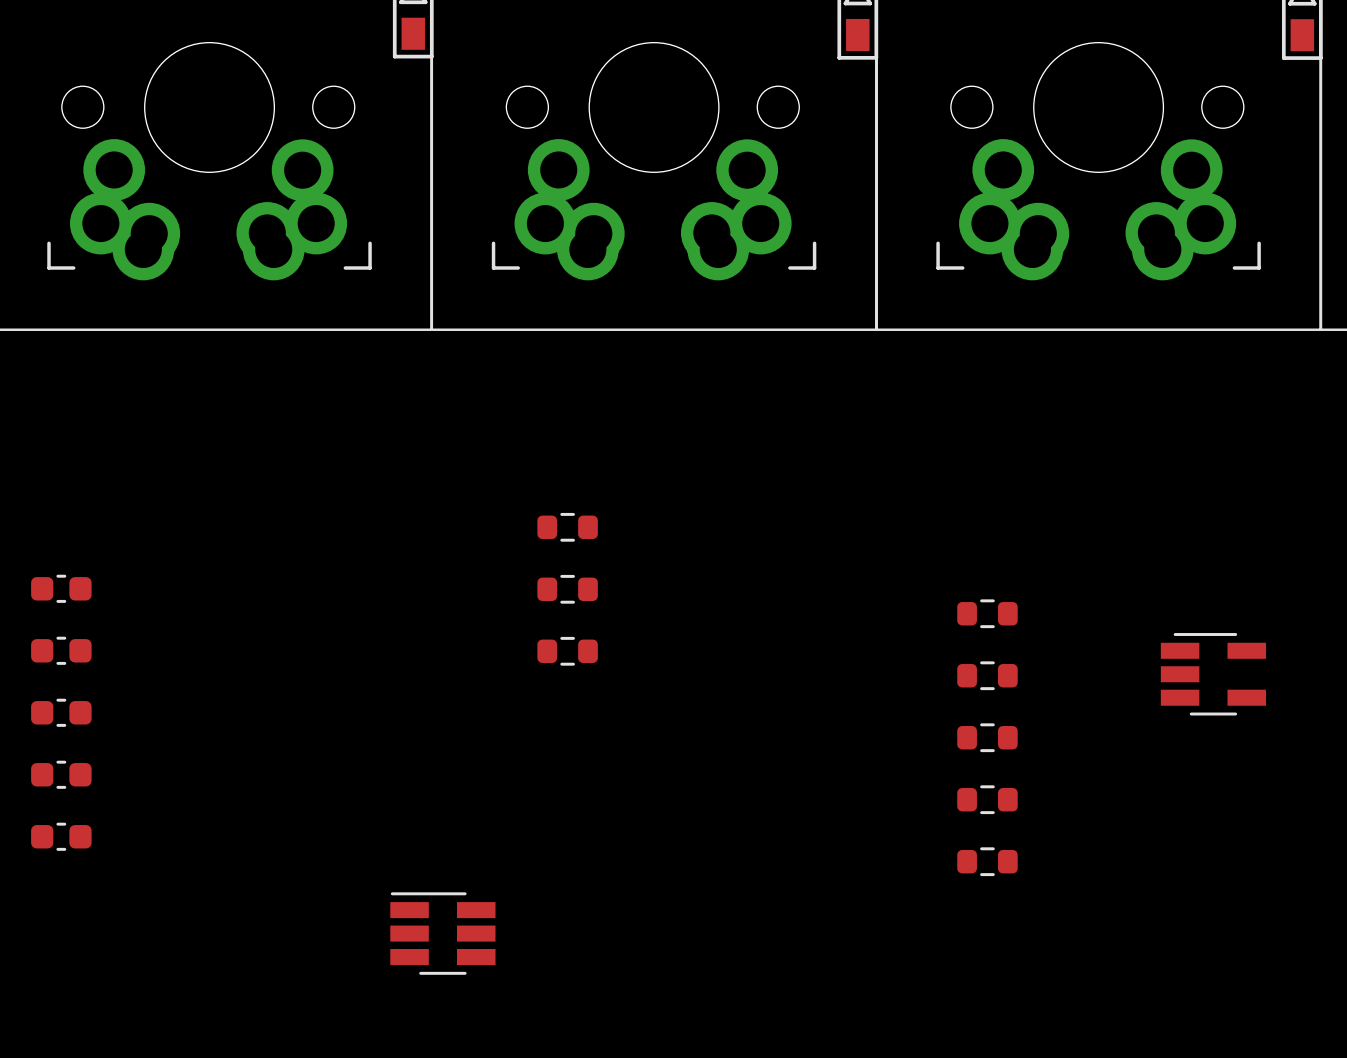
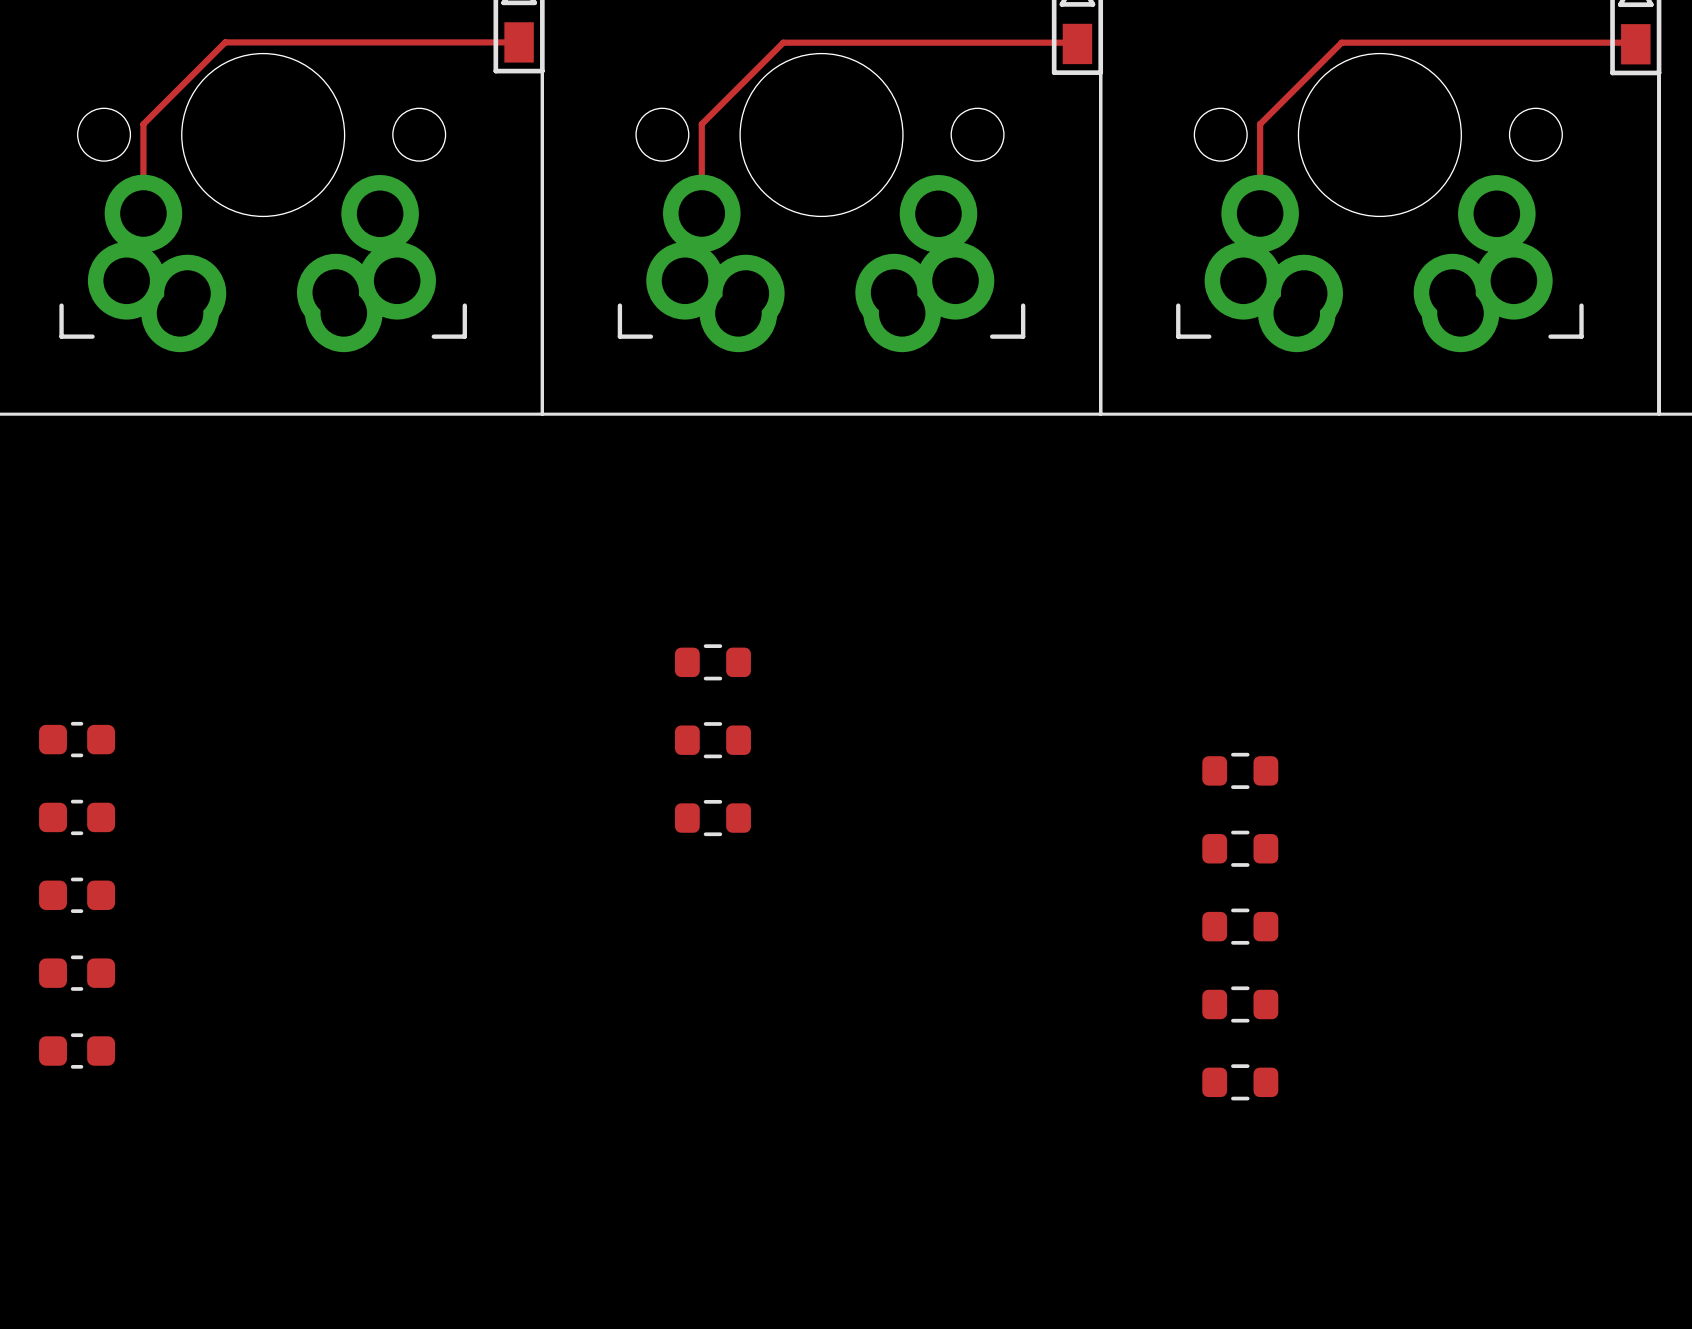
track: none -> (519, 42) (225, 42) (143, 124) (143, 213)
track: none -> (1077, 43) (783, 42) (701, 124) (701, 213)
track: none -> (1635, 44) (1634, 42) (1341, 42) (1260, 124) (1260, 213)
part: (1213, 674) -> none
part: (442, 933) -> none

